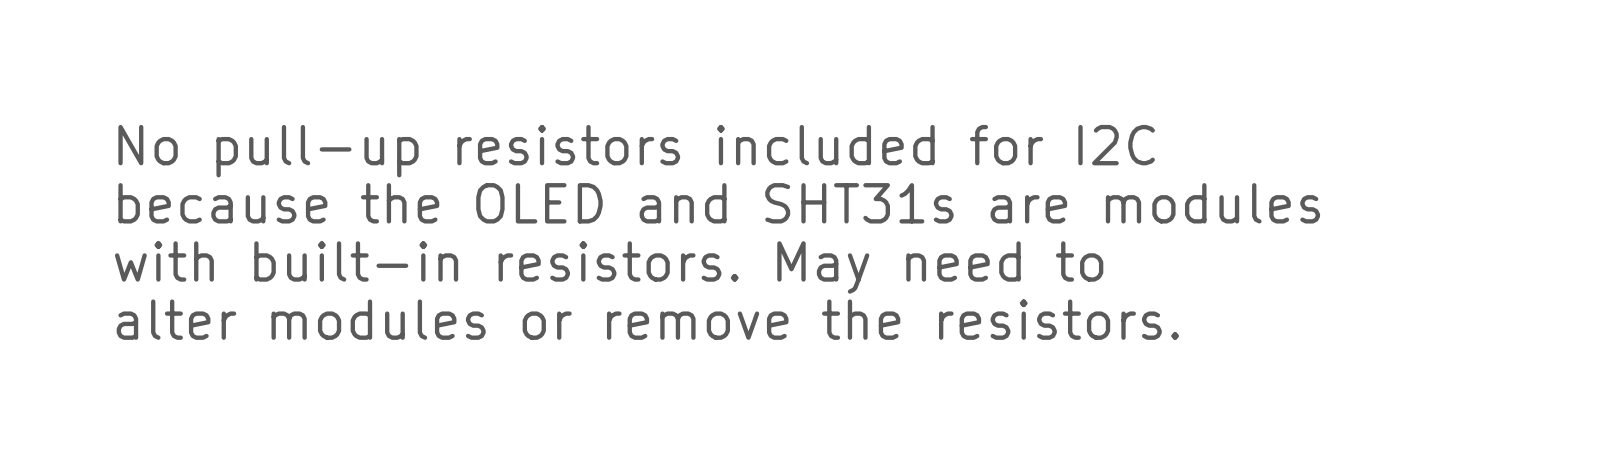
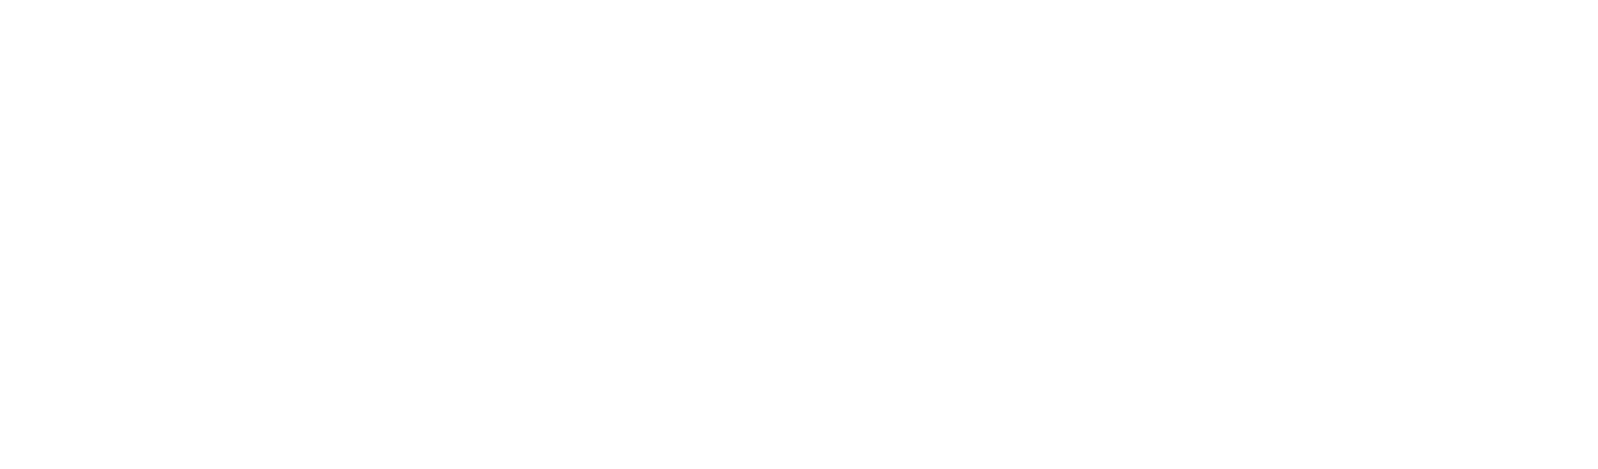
text: No pull-up resistors included for I2C (636, 151) -> none
text: because the OLED and SHT31s are modules (719, 203) -> none
text: with built-in resistors. May need to (609, 267) -> none
text: alter modules or remove the resistors. (647, 319) -> none

